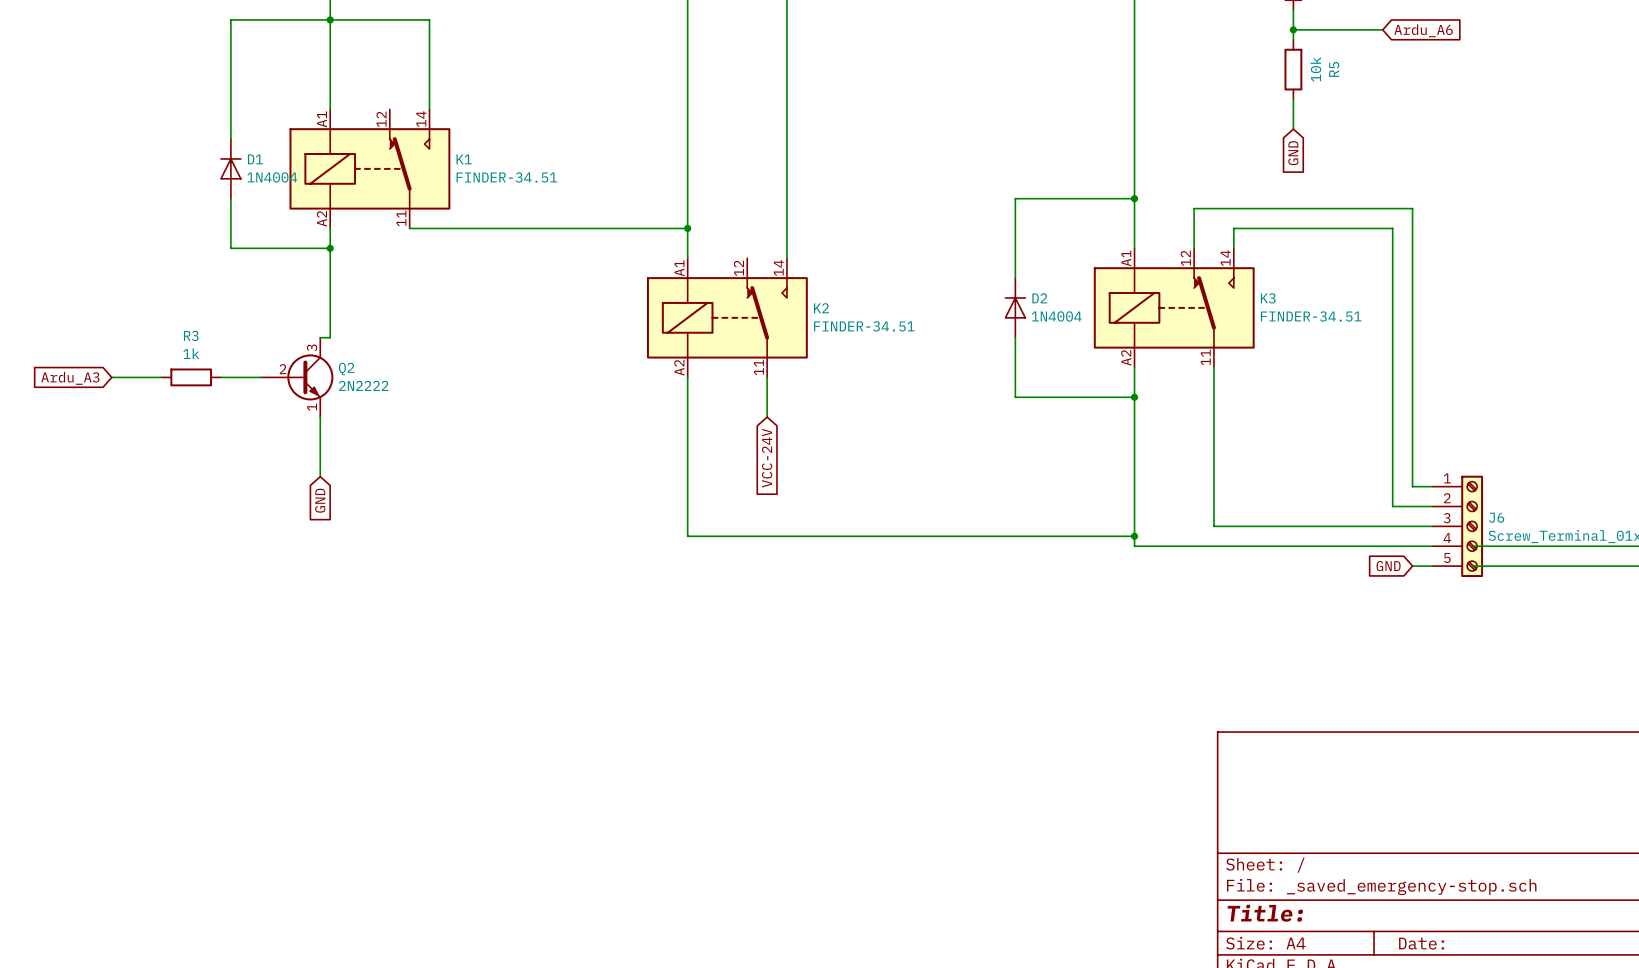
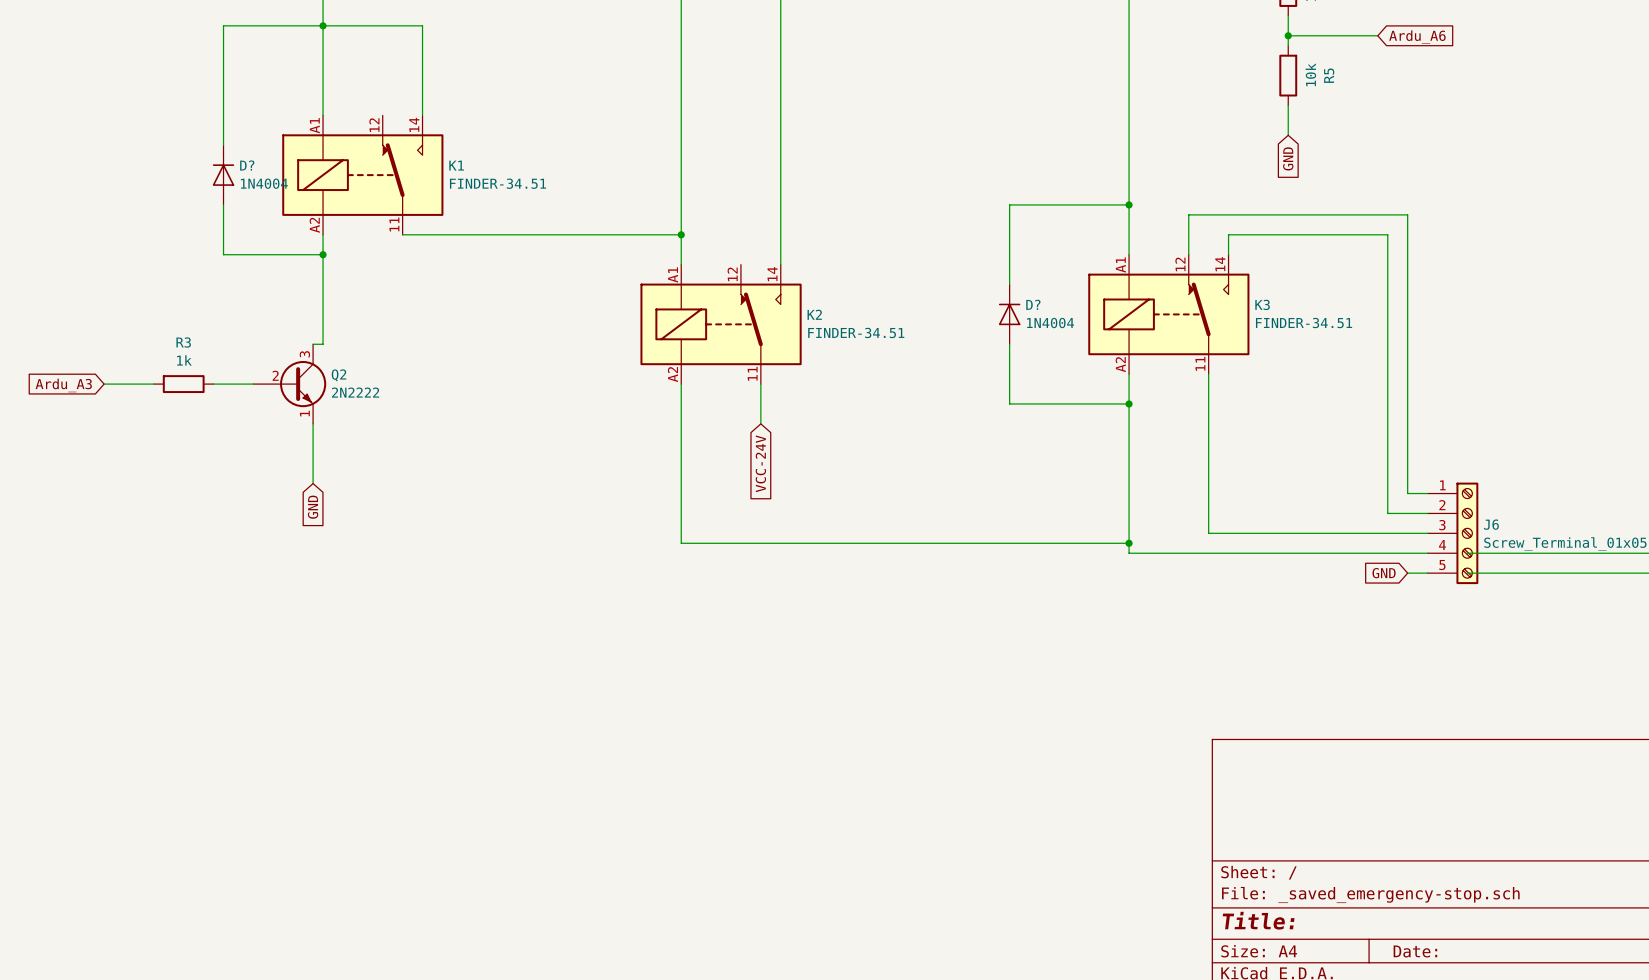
D1 name: D1 (255, 159) -> D? (247, 165)
D2 name: D2 (1039, 298) -> D? (1033, 304)

